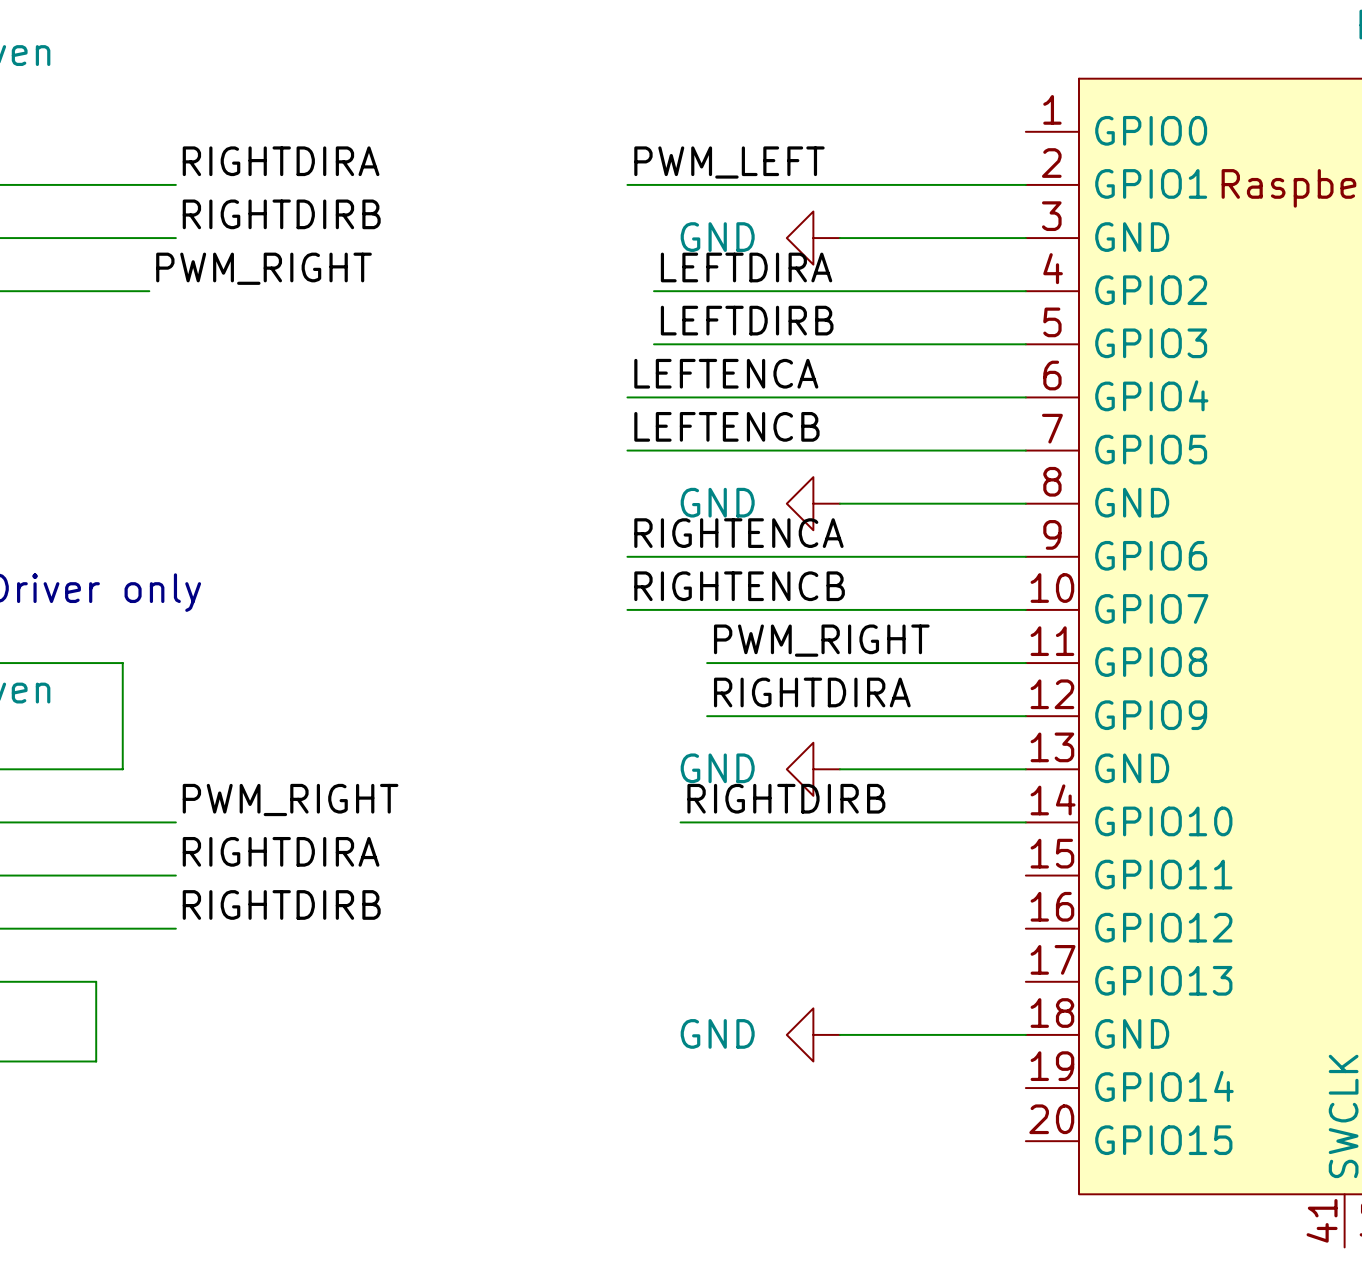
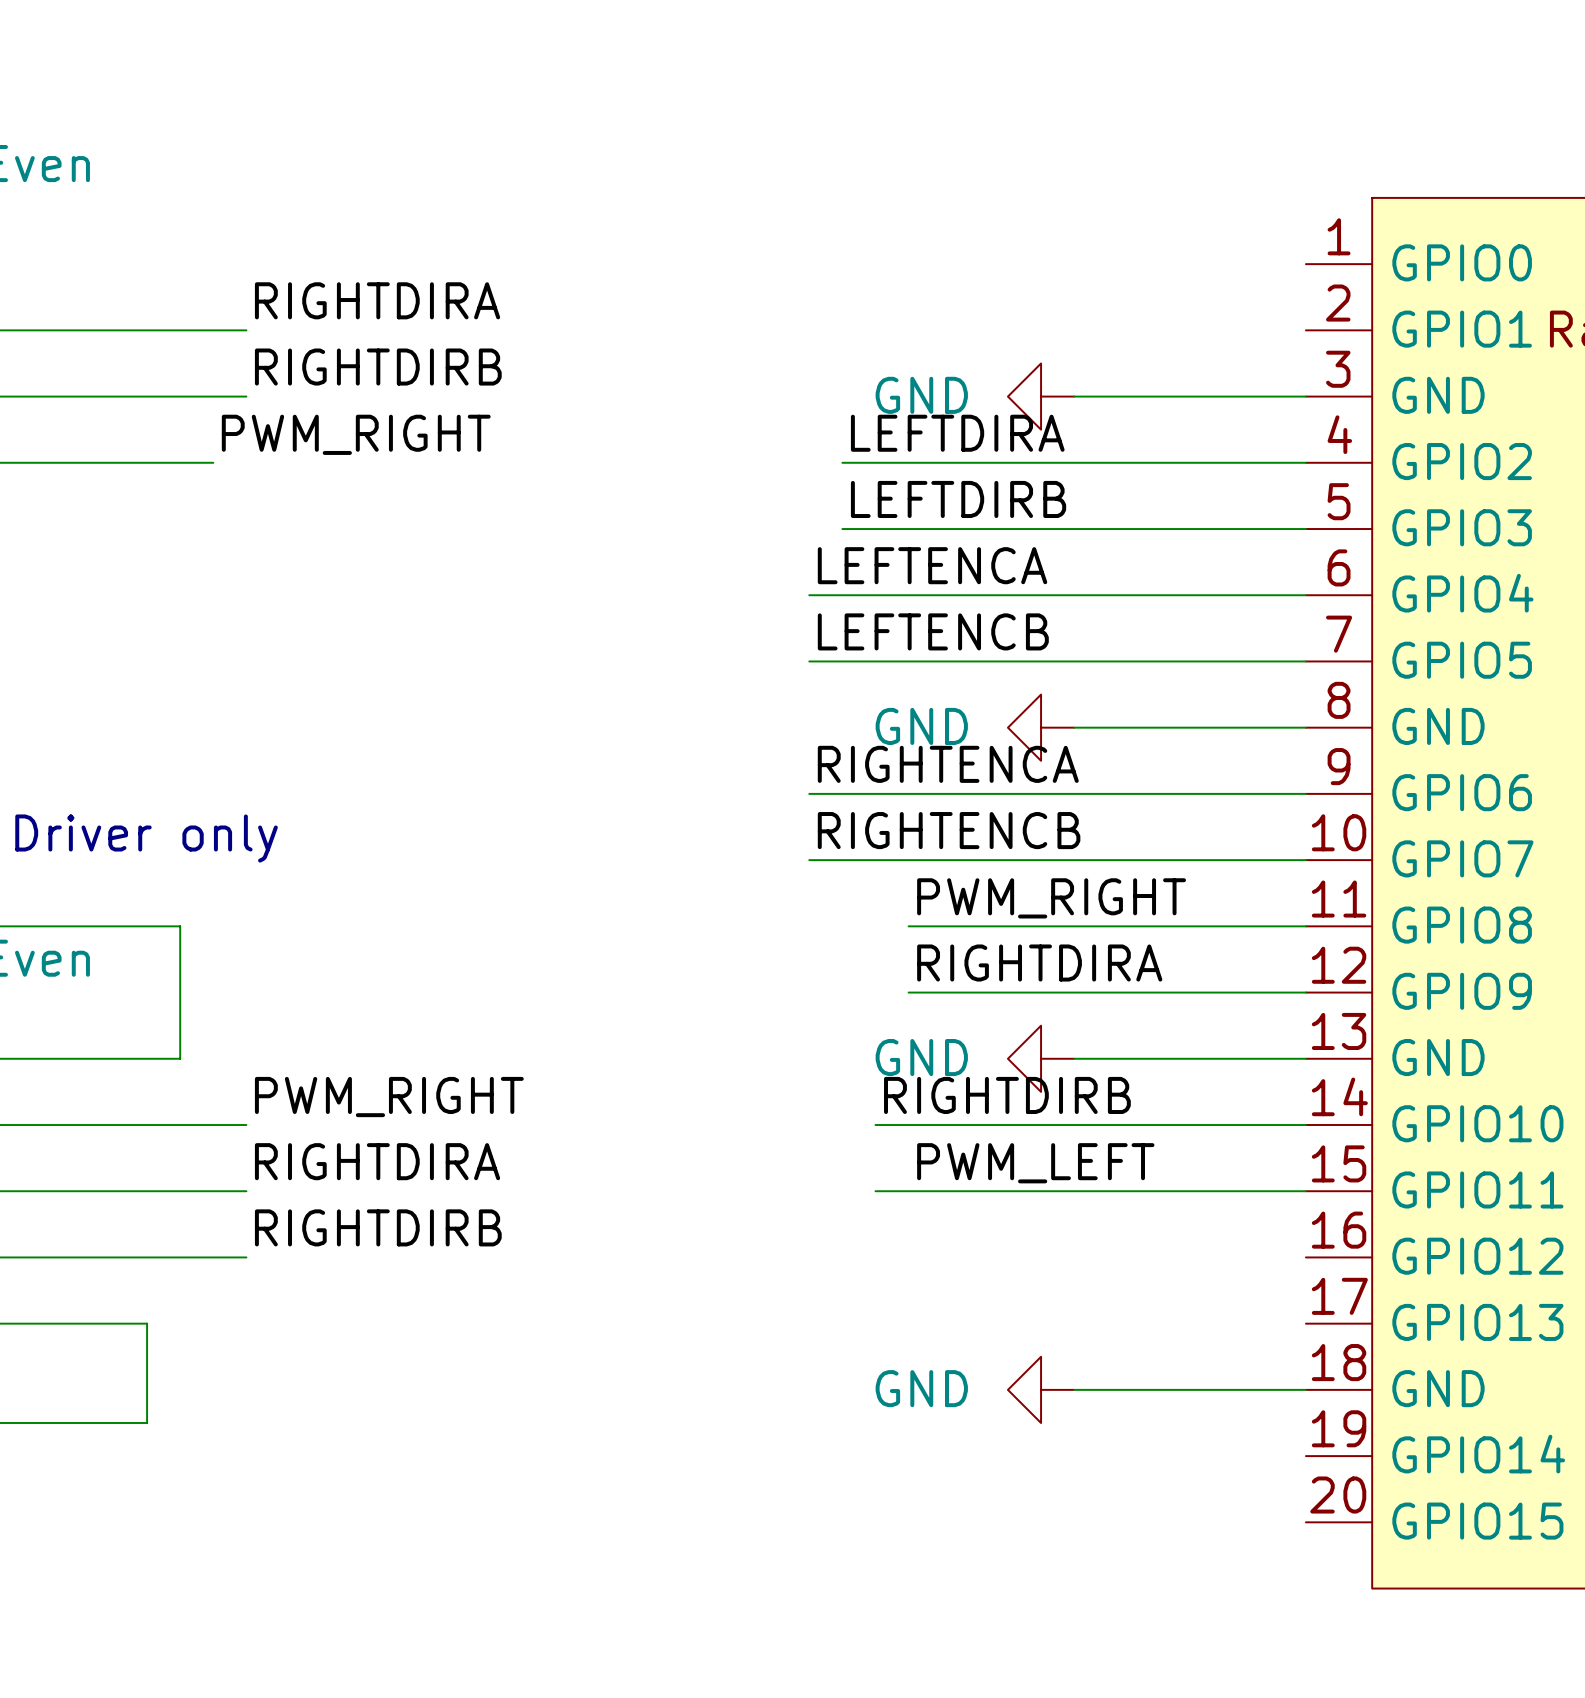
label: PWM_LEFT (729, 162) -> none
wire: (627, 184) (1025, 184) -> none
label: none -> PWM_LEFT (1035, 1163)
wire: none -> (875, 1191) (1305, 1191)

